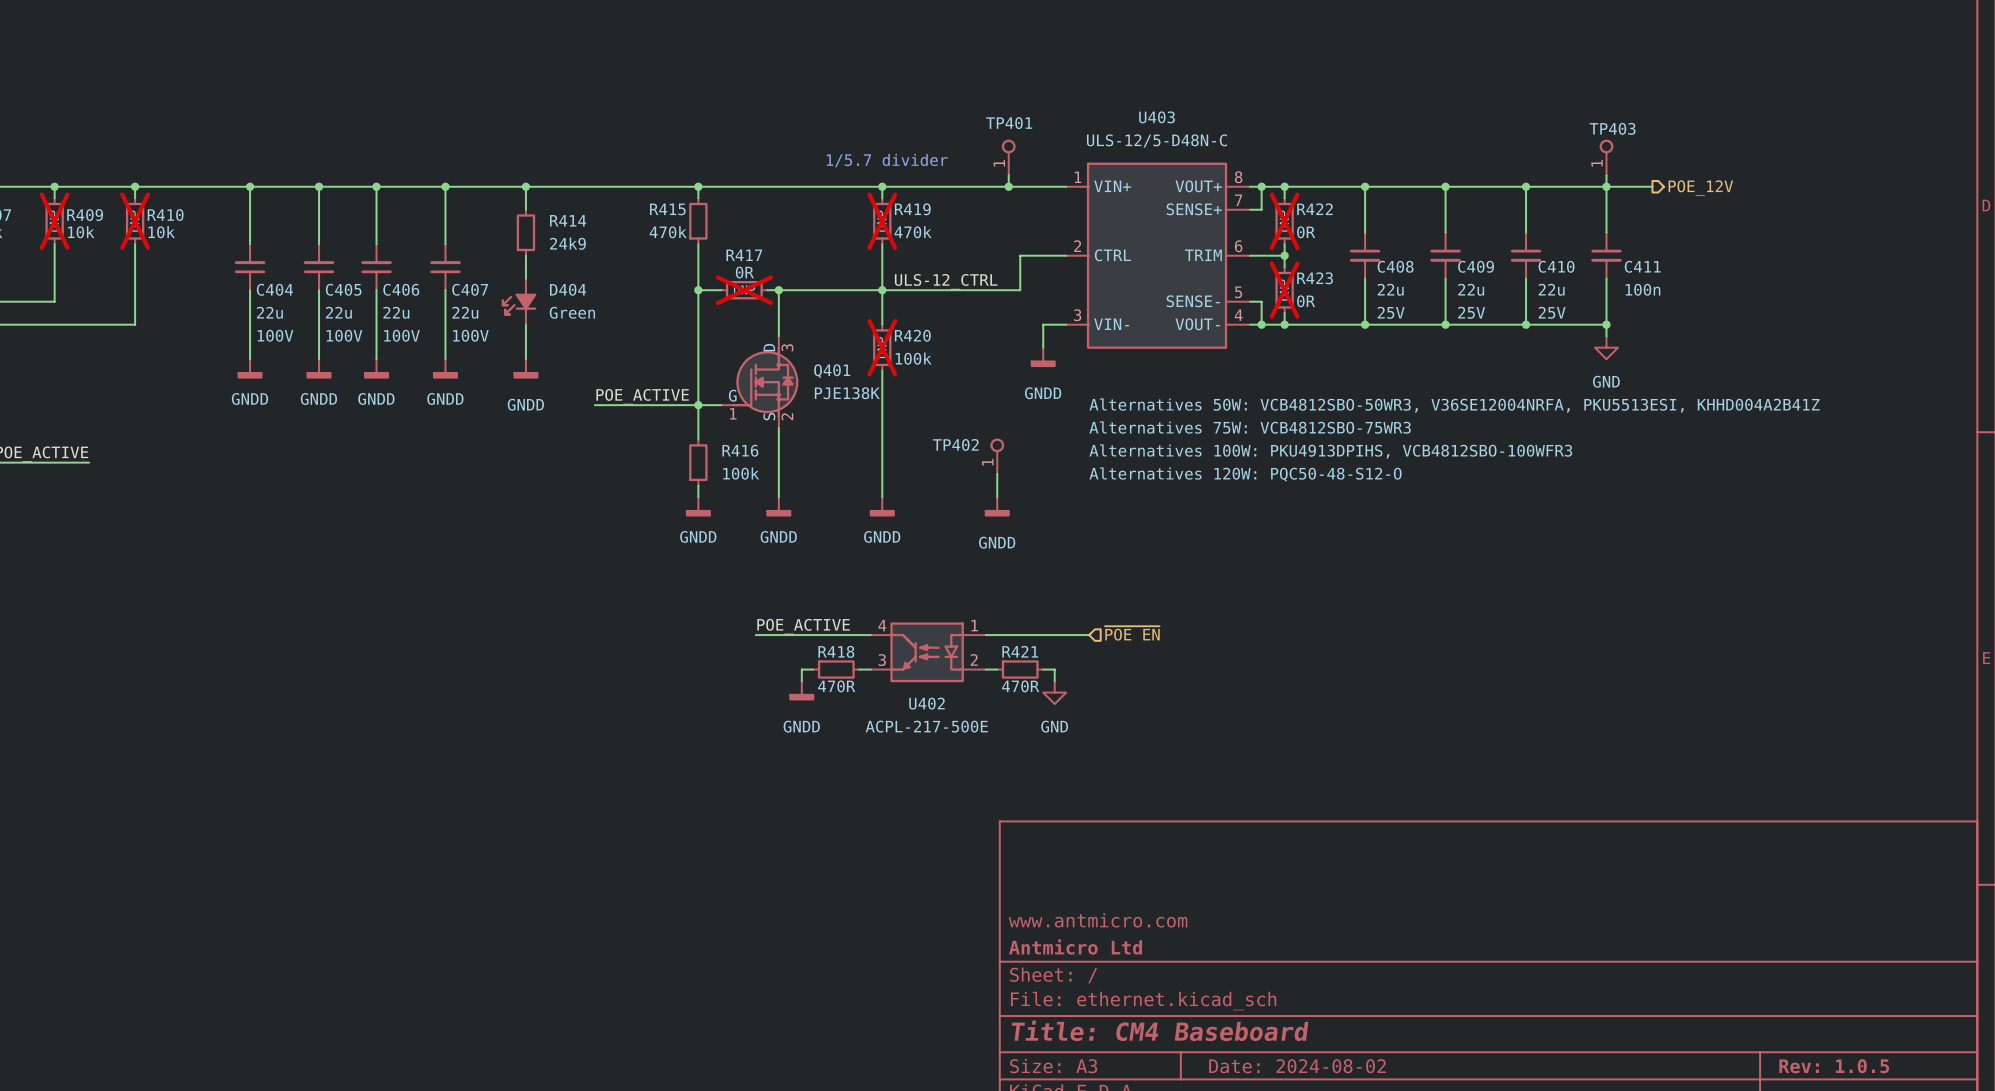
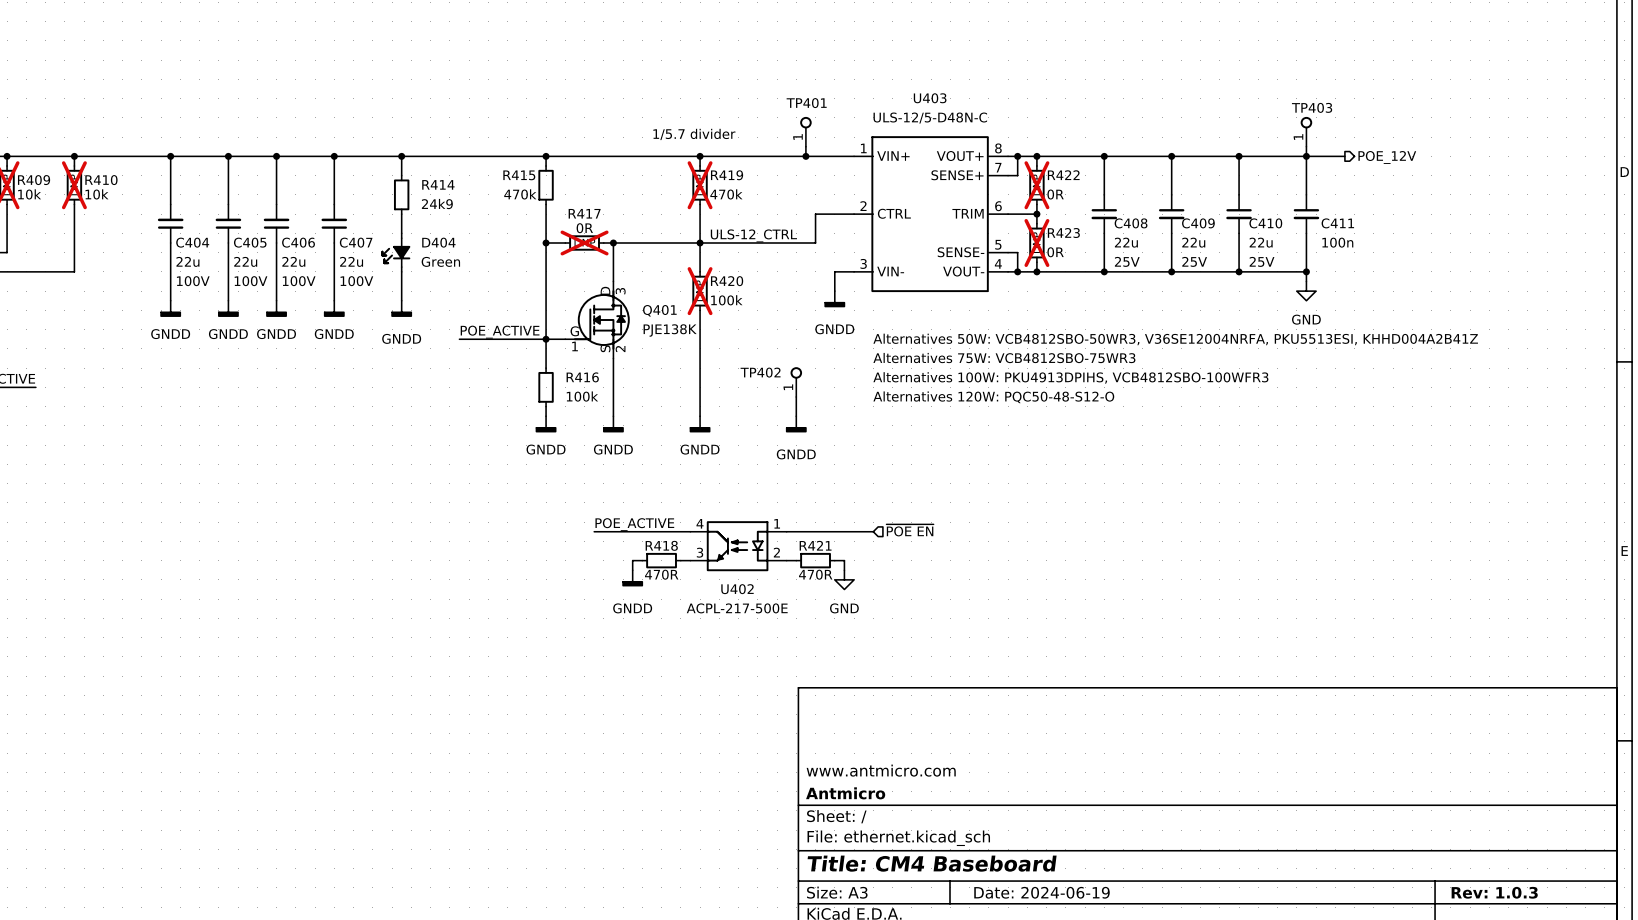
title block: Antmicro Ltd (1075, 946) -> Antmicro (845, 793)
title block: Date: 2024-08-02 (1297, 1066) -> Date: 2024-06-19 (1042, 892)
title block: Rev: 1.0.5 (1834, 1066) -> Rev: 1.0.3 (1494, 892)

